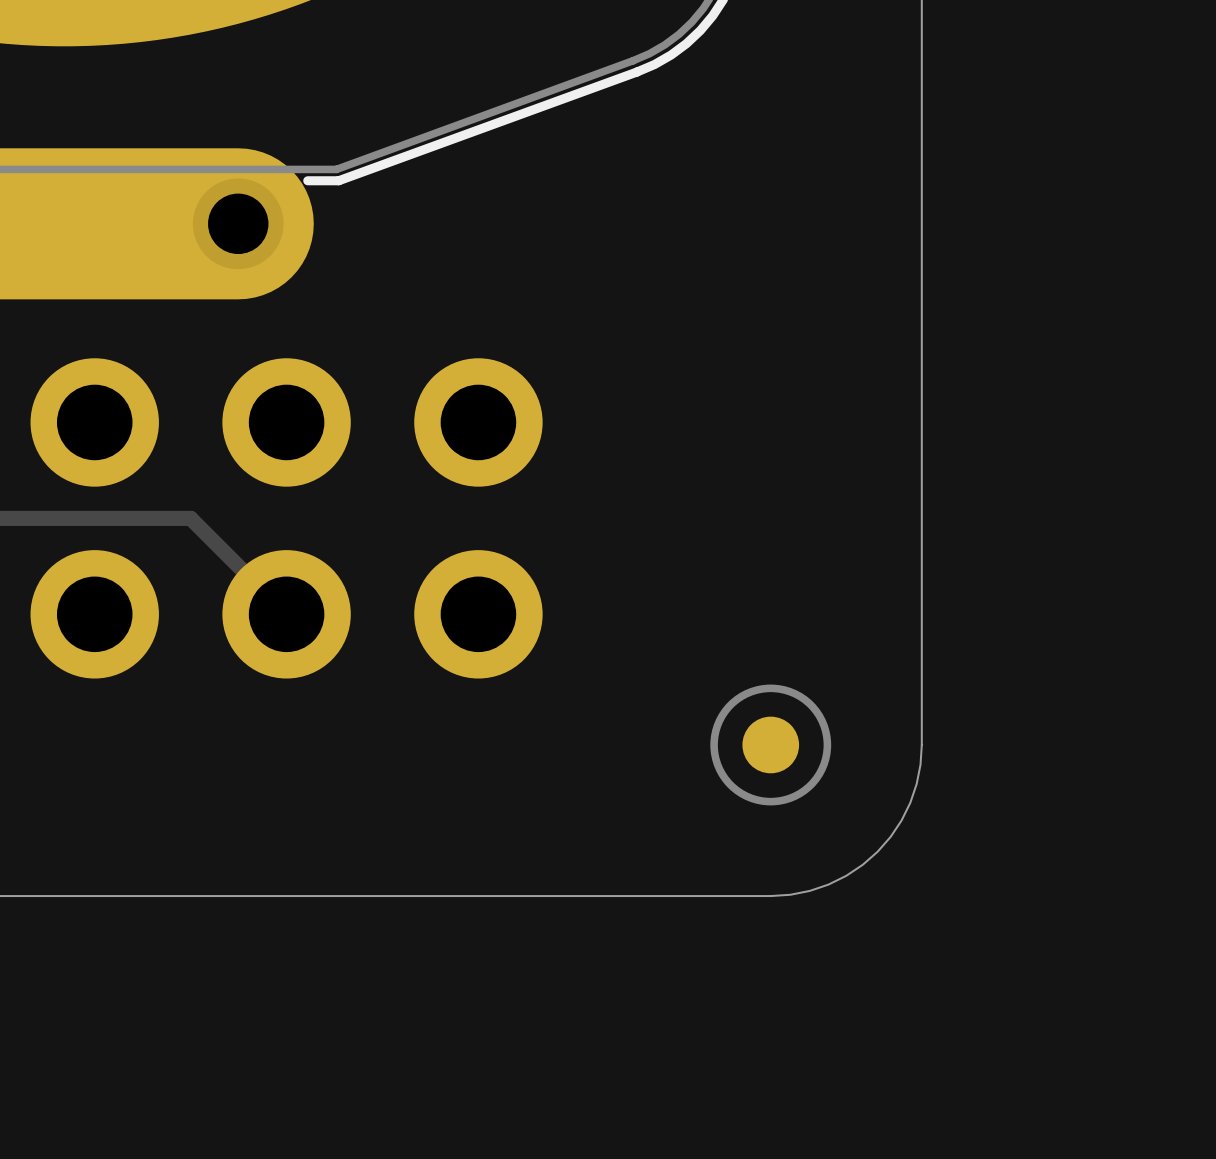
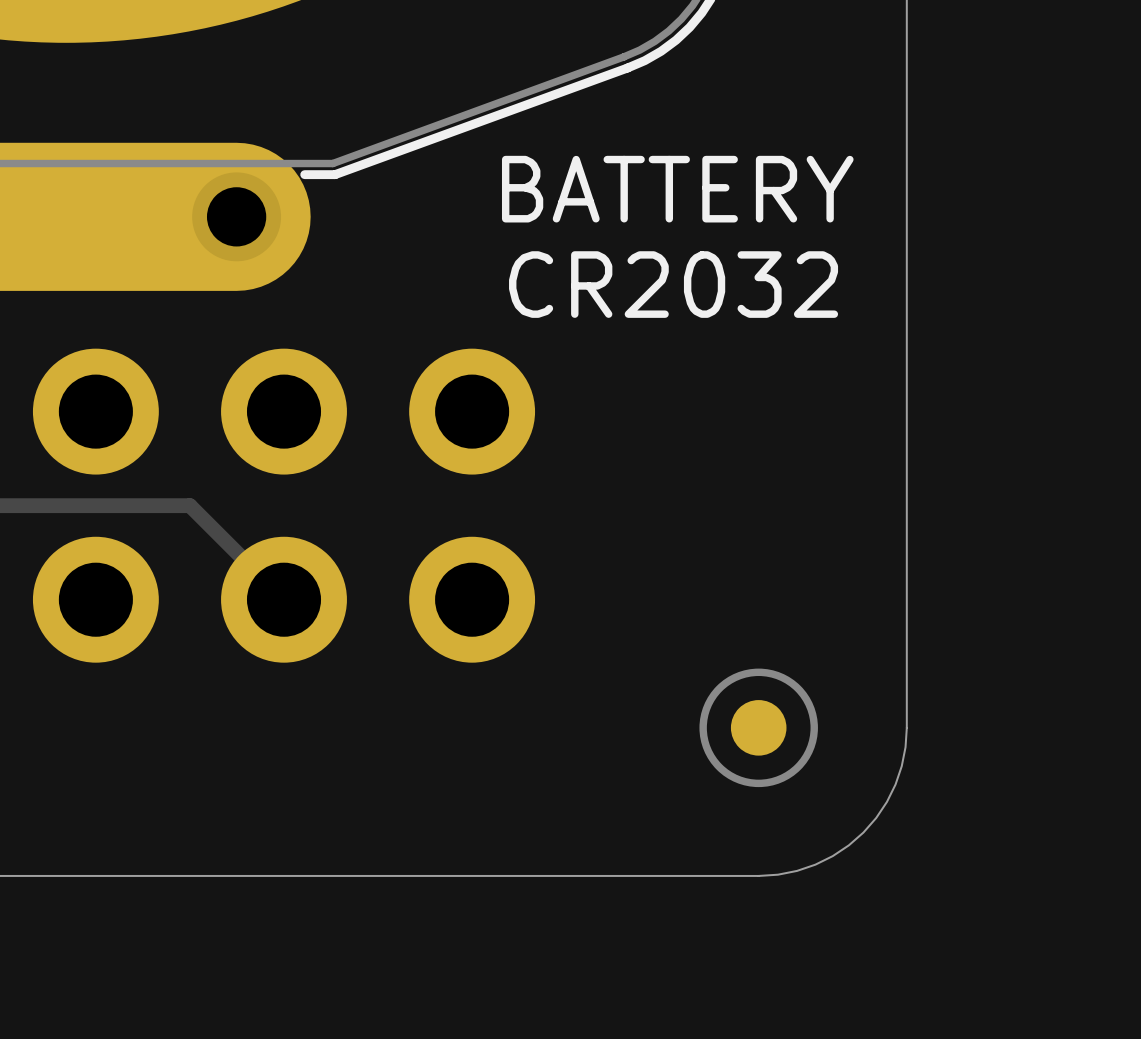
text: none -> BATTERY (677, 189)
text: none -> CR2032 (673, 284)

